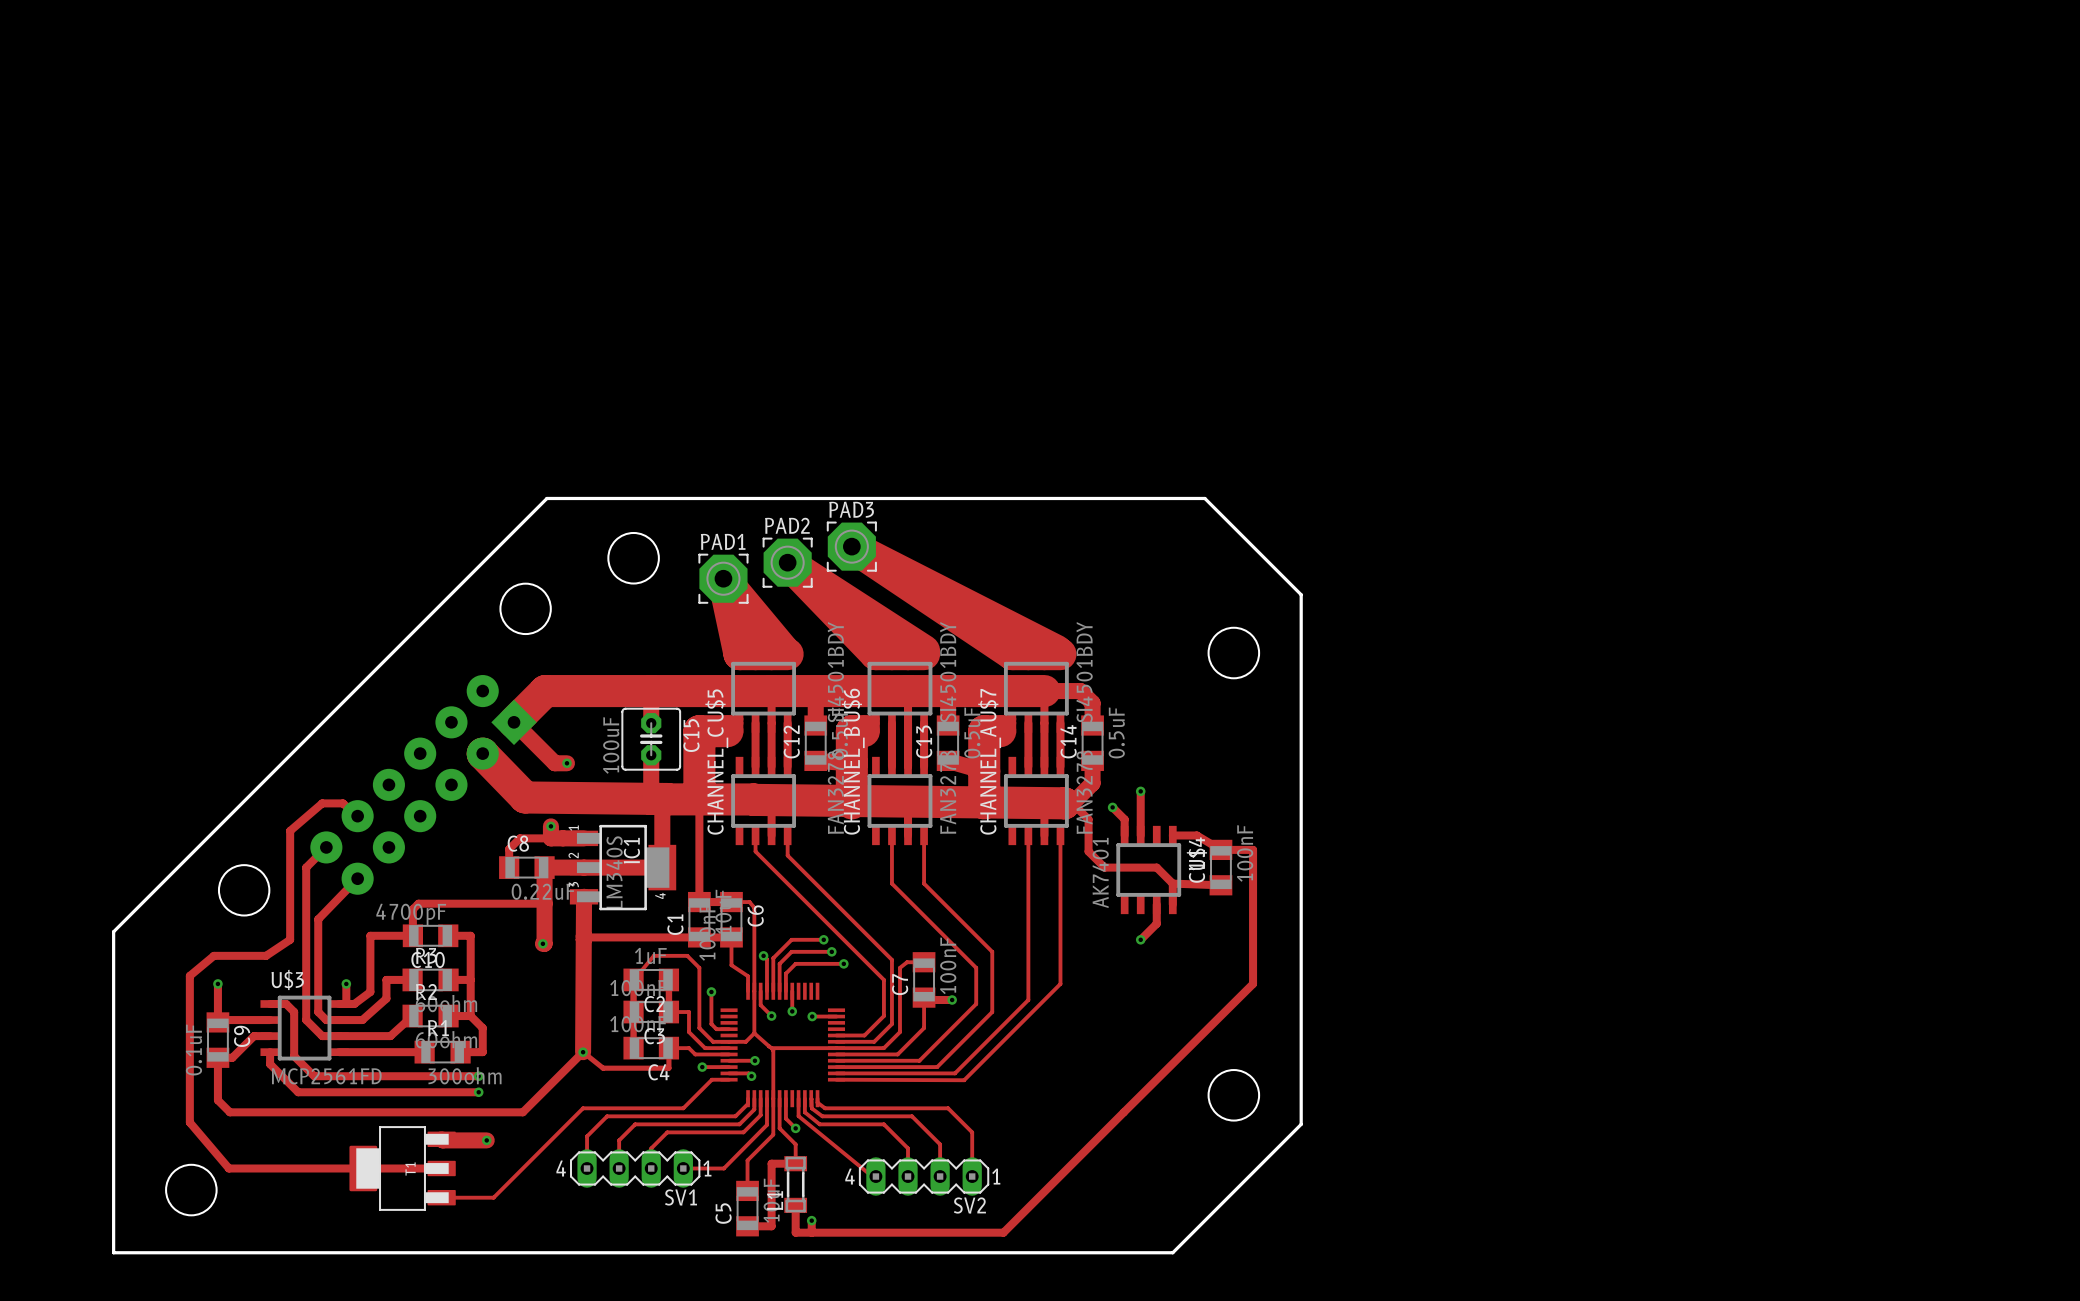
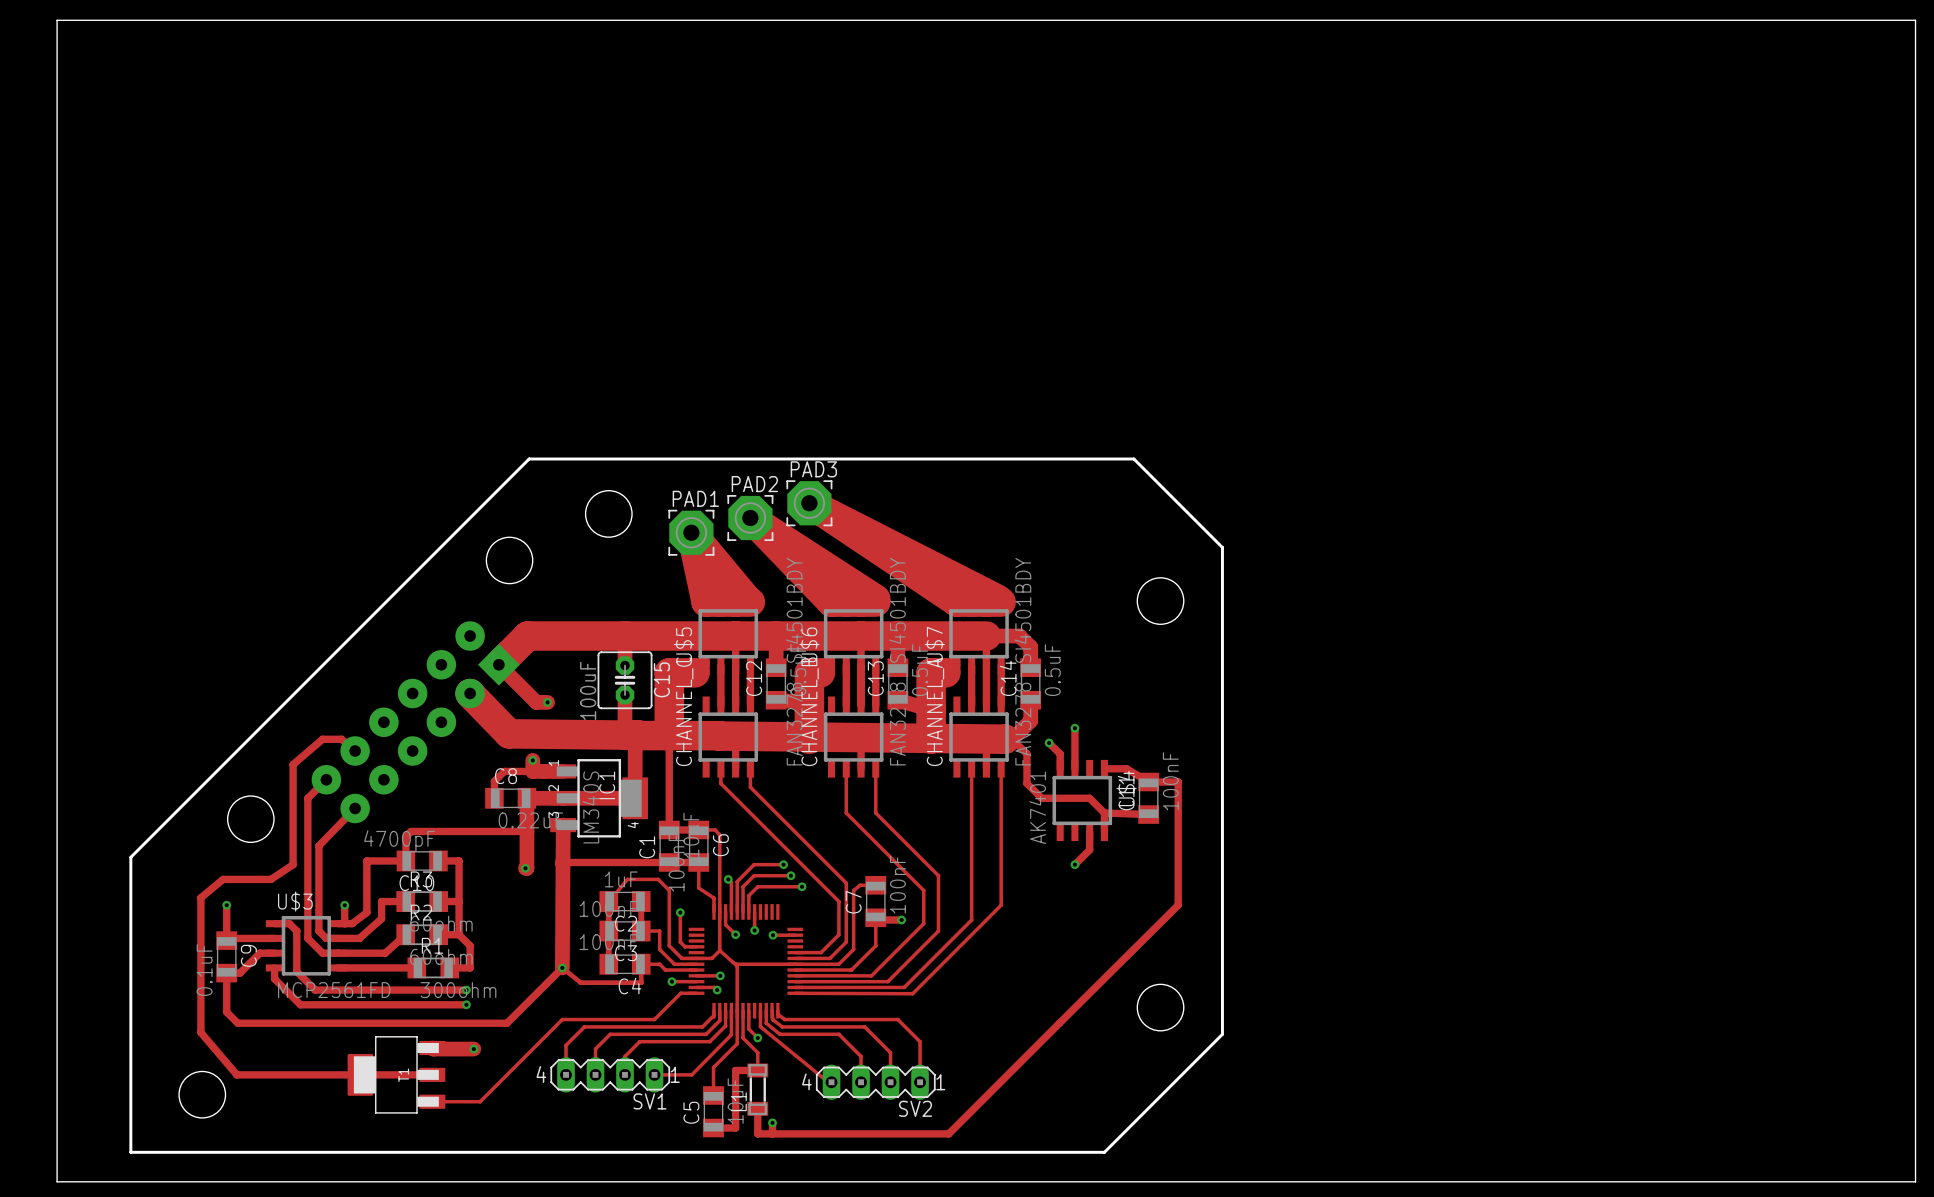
board edge: none -> (57, 20) (1915, 20) (1915, 1181) (57, 1181) (57, 20)

